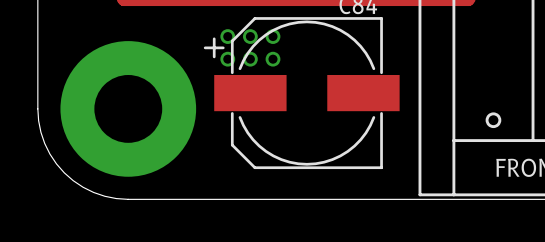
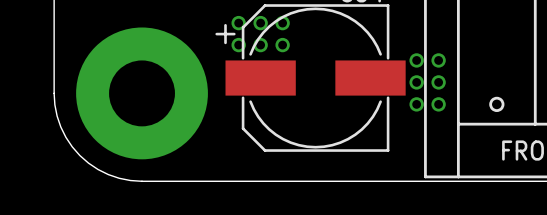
via: none -> (416, 60)
via: none -> (438, 60)
via: none -> (416, 82)
via: none -> (438, 82)
via: none -> (416, 104)
via: none -> (438, 104)

